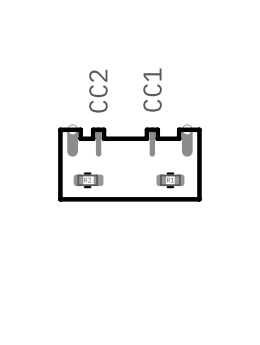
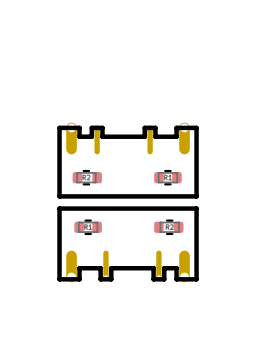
part value: CC1 (152, 90) -> none
part value: CC2 (98, 91) -> none
board edge: none -> (59, 208) (196, 208) (196, 279) (176, 279) (176, 268) (164, 268) (164, 279) (153, 279) (153, 268) (111, 268) (111, 279) (100, 279) (100, 268) (79, 268) (79, 279) (59, 279) (59, 208)
part: none -> (88, 227)
part: none -> (168, 227)
part: none -> (105, 265)
part: none -> (158, 265)
part: none -> (71, 266)
part: none -> (184, 266)

